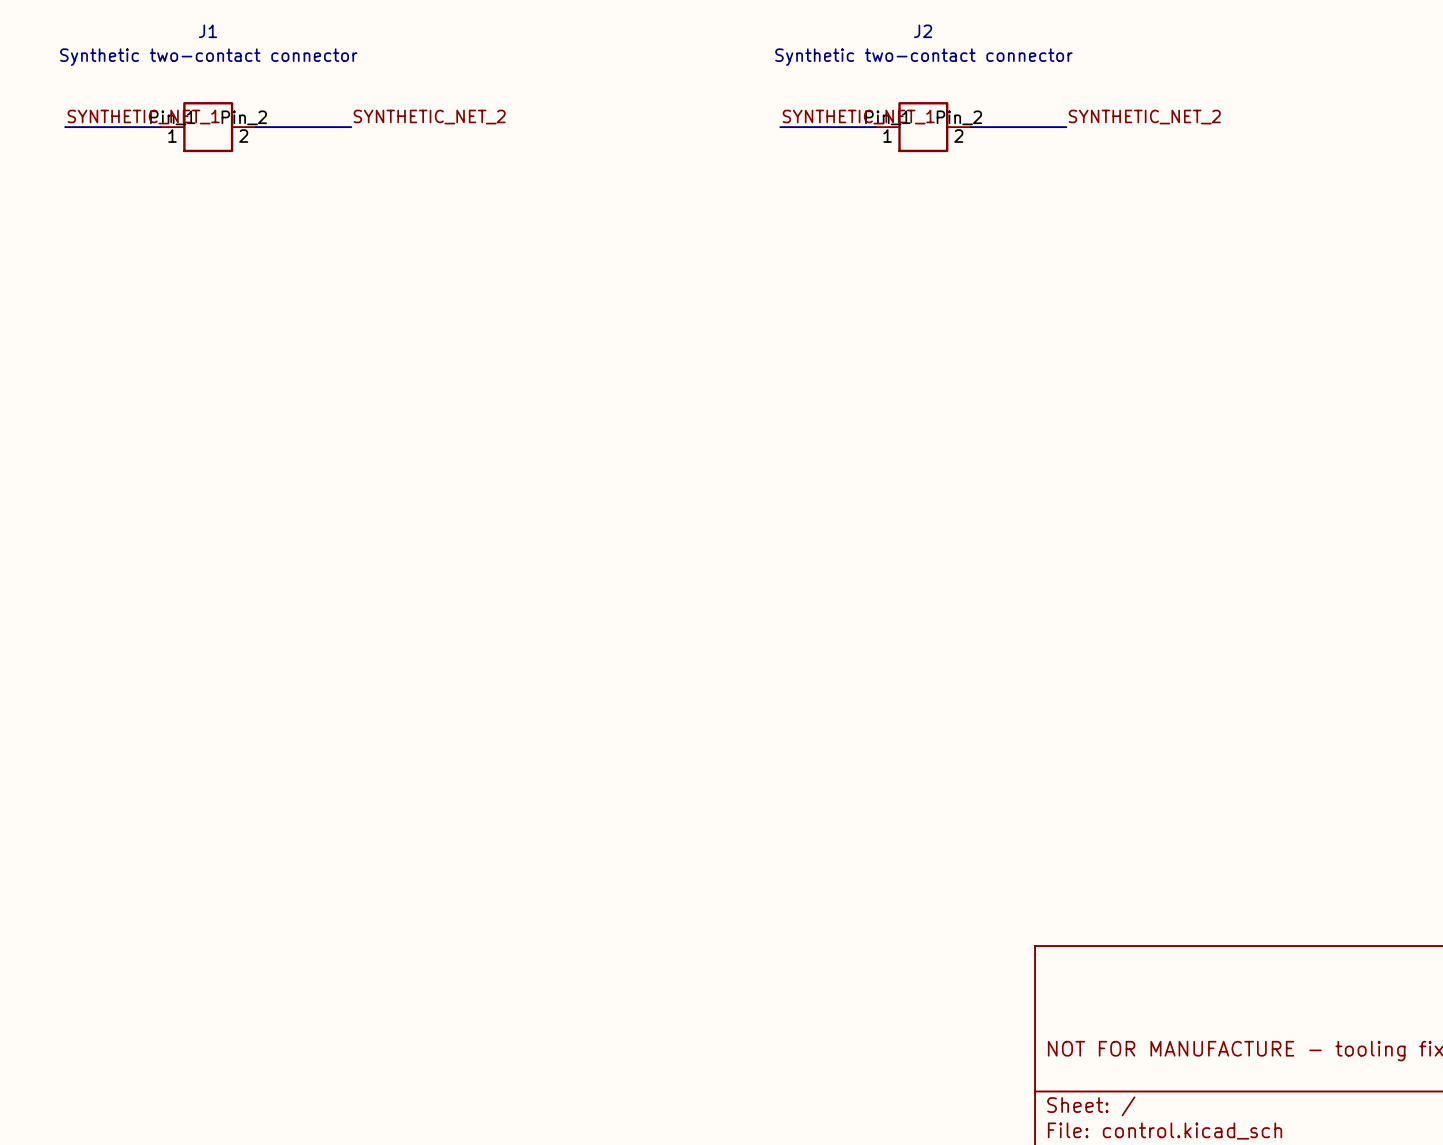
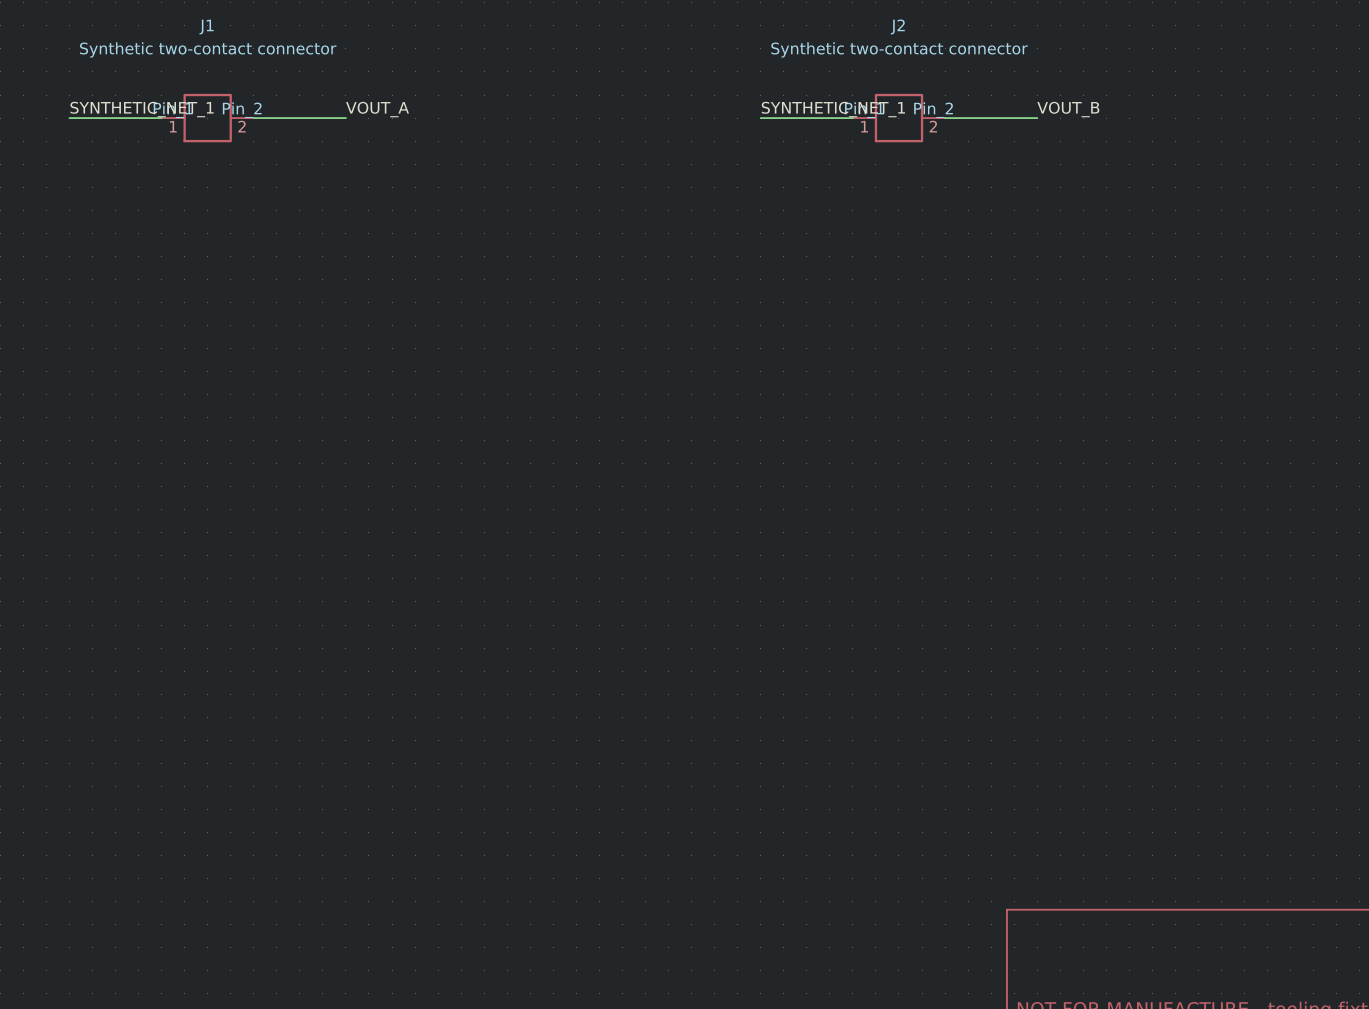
label: SYNTHETIC_NET_2 (429, 117) -> VOUT_A (377, 109)
label: SYNTHETIC_NET_2 (1144, 117) -> VOUT_B (1068, 109)

